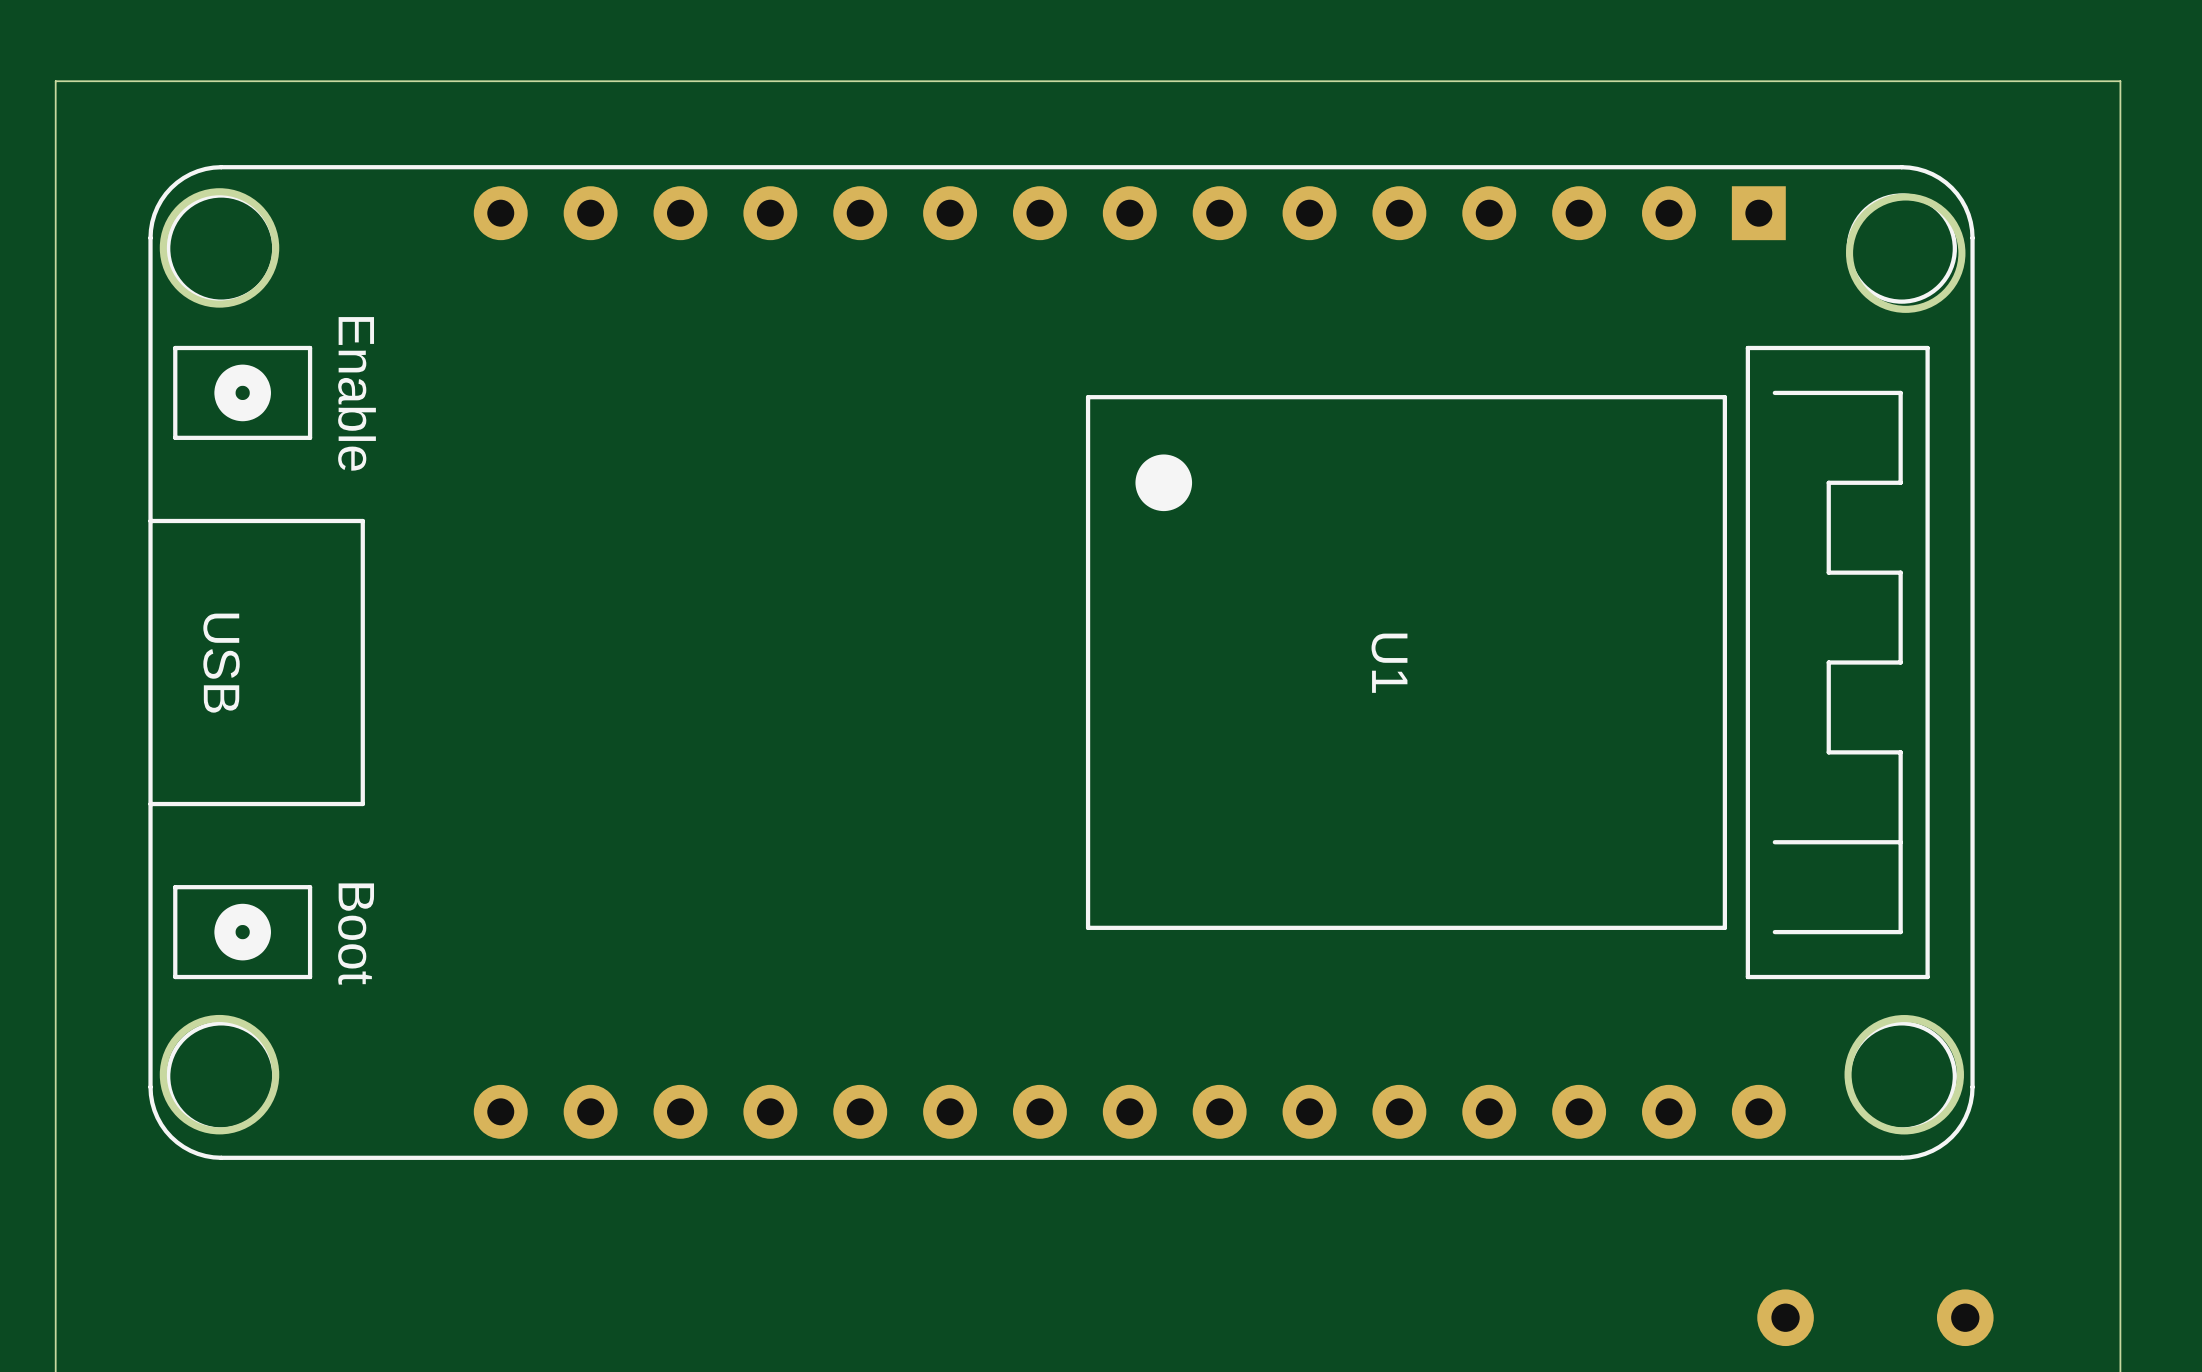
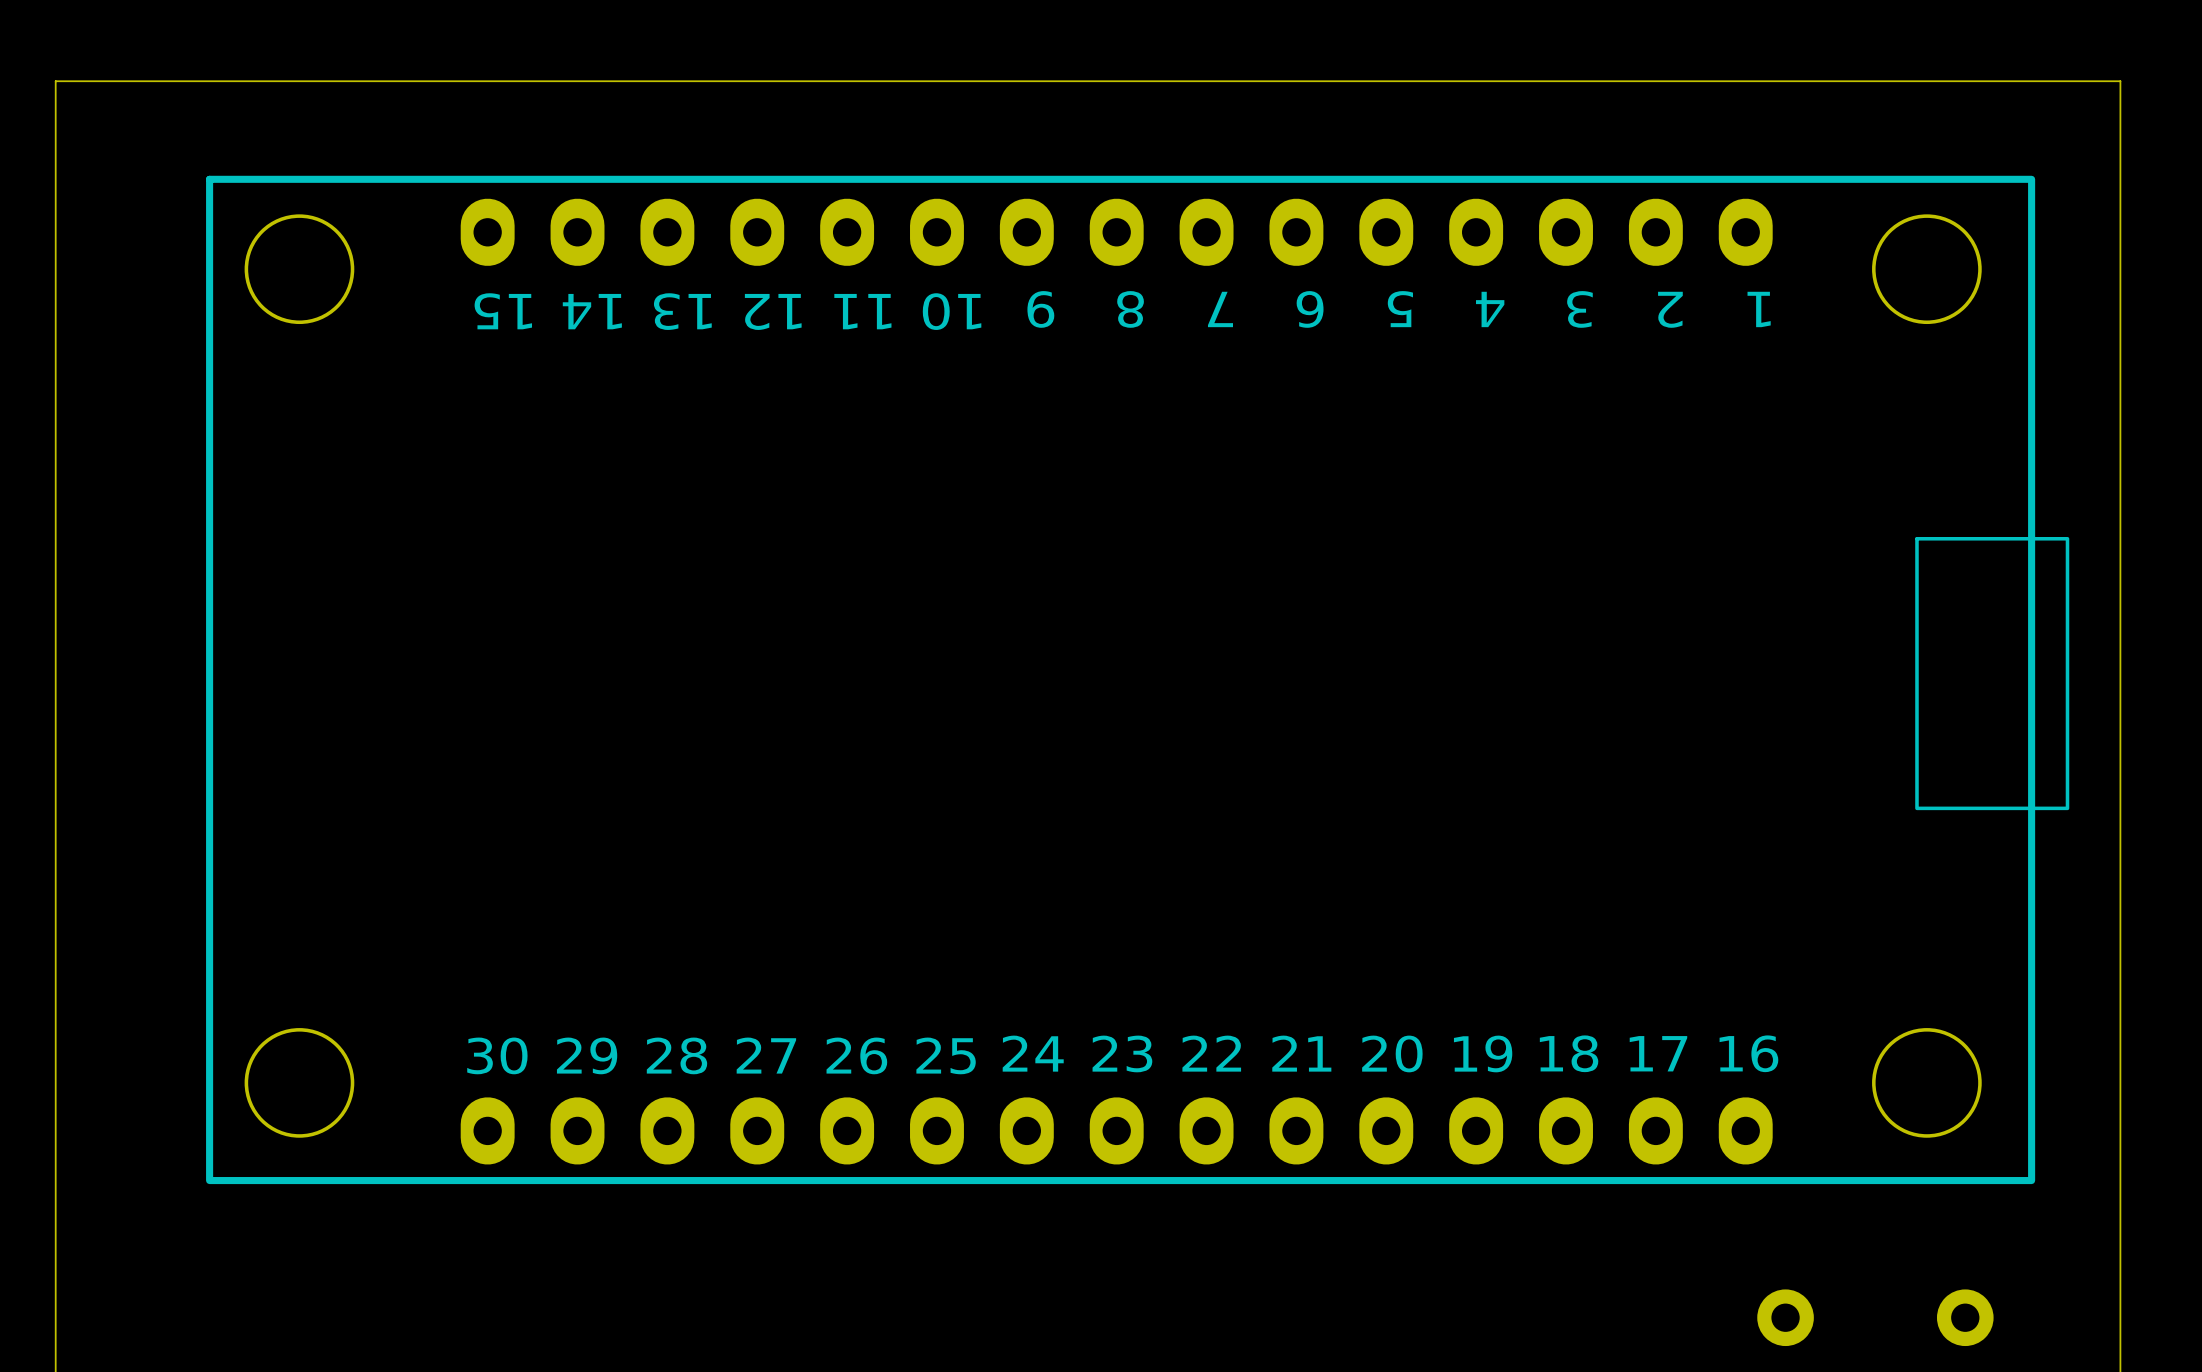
round board edge: [159, 188, 280, 308] -> none
round board edge: [1846, 193, 1966, 313] -> none
U1: (1061, 662) -> none
part: none -> (1137, 679)
round board edge: [159, 1014, 280, 1135] -> none
round board edge: [1844, 1015, 1964, 1135] -> none

